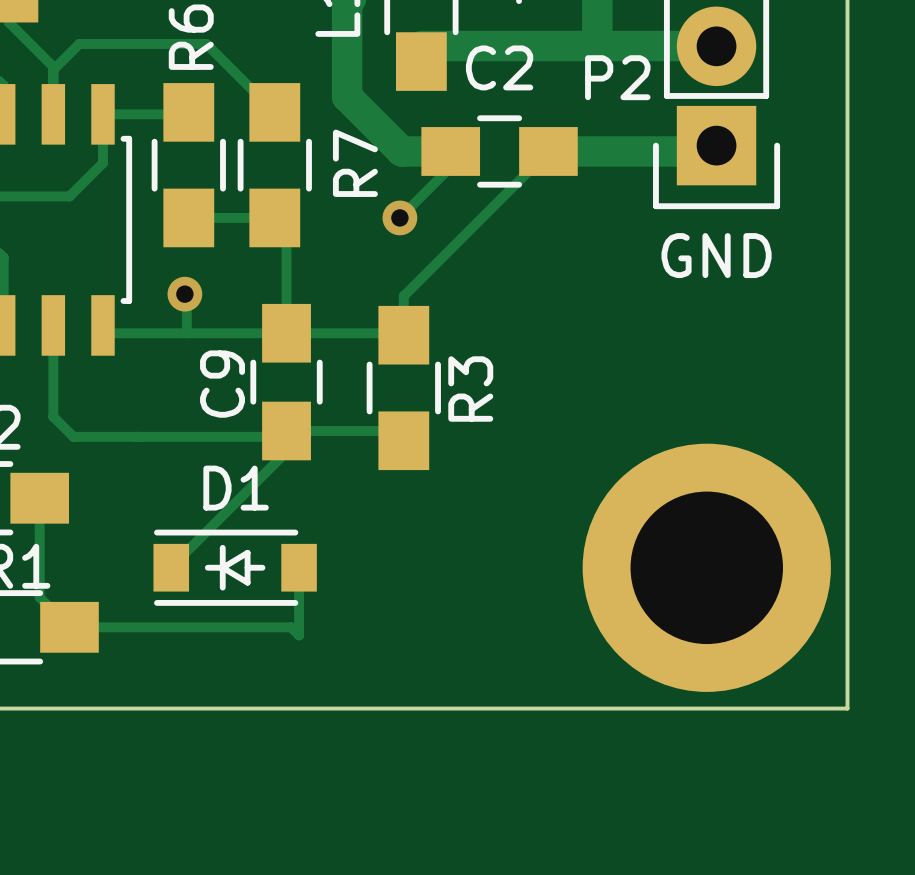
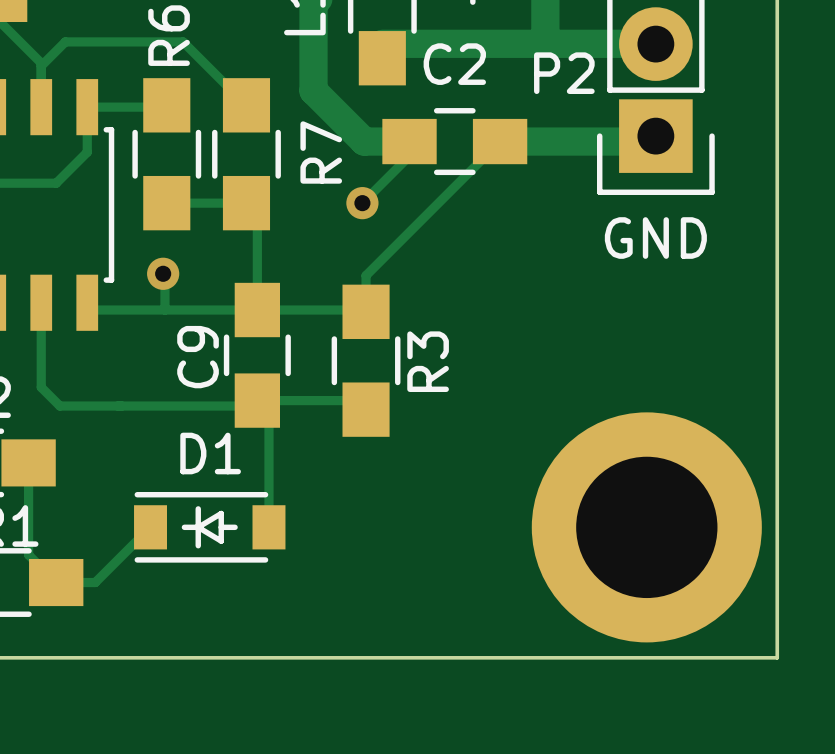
track: (286, 430) (286, 451) (171, 567) -> none
track: none -> (268, 412) (268, 527)
track: (299, 567) (299, 635) (291, 627) (111, 627) -> (150, 527) (95, 582)

